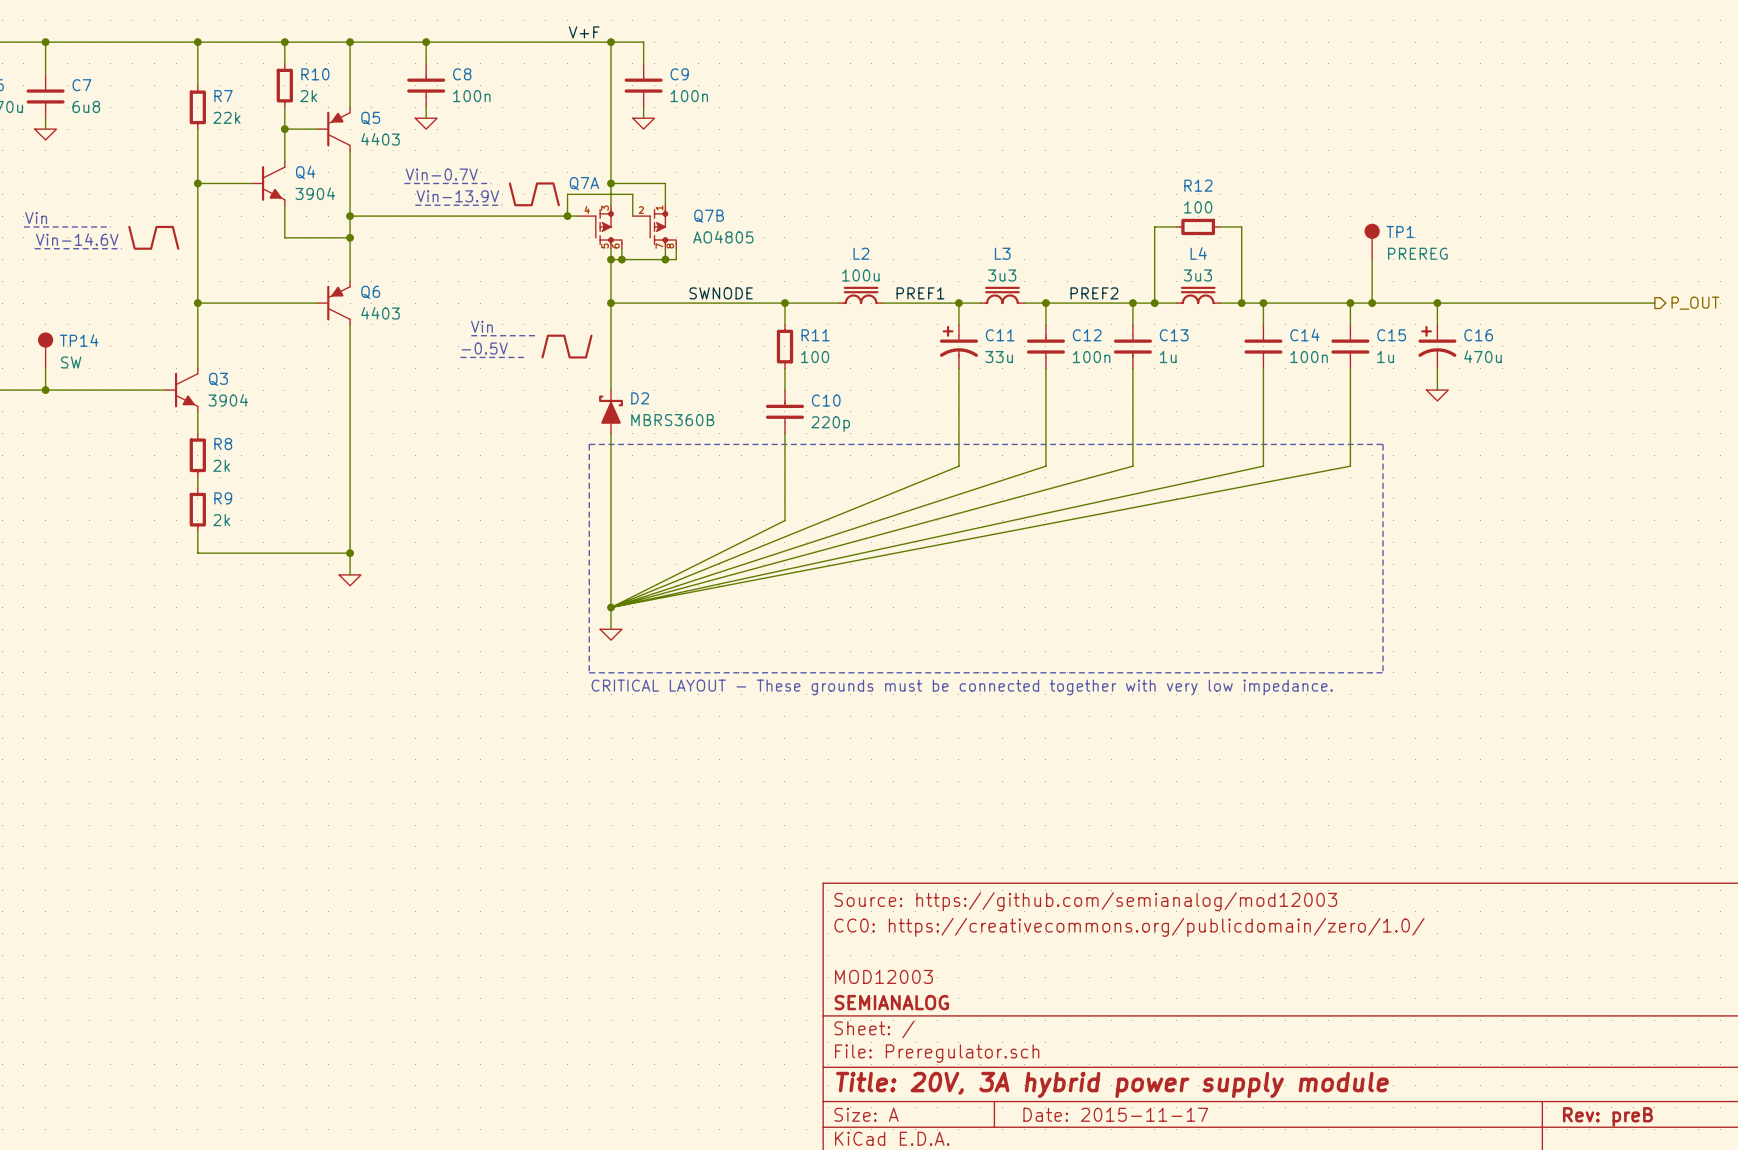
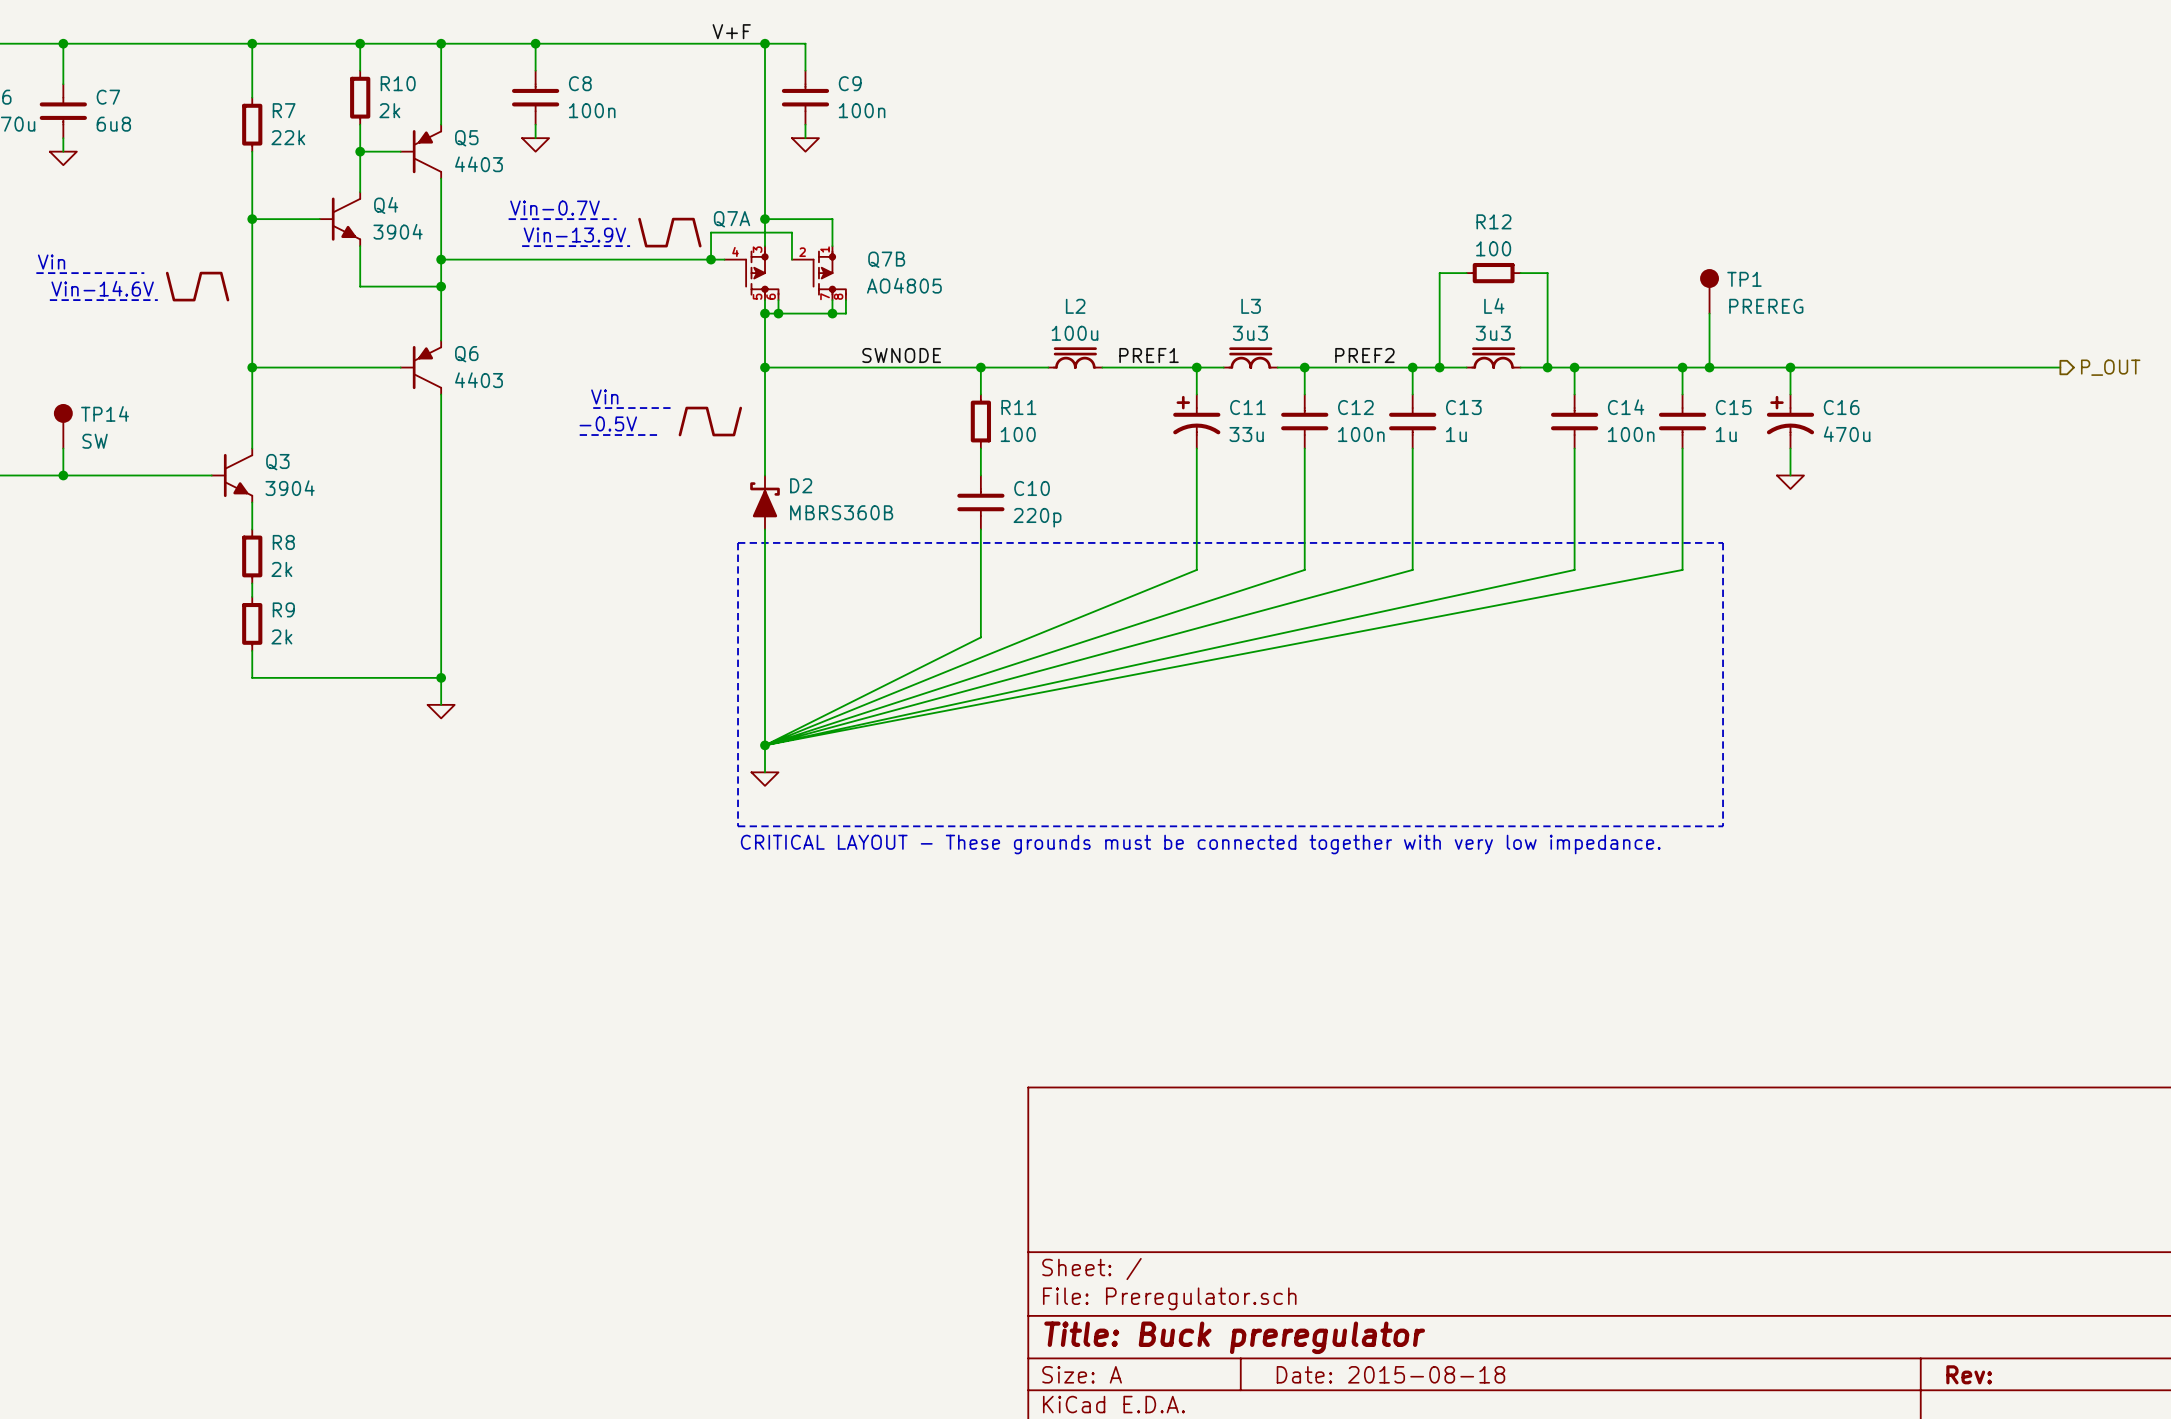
title block: Source: https://github.com/semianalog/mod12003 (1085, 901) -> none
title block: CC0: https://creativecommons.org/publicdomain/zero/1.0/ (1129, 927) -> none
title block: MOD12003 (883, 976) -> none
title block: SEMIANALOG (891, 1002) -> none
title block: Title: 20V, 3A hybrid power supply module (1112, 1084) -> Title: Buck preregulator (1234, 1337)
title block: Date: 2015-11-17 (1115, 1114) -> Date: 2015-08-18 (1390, 1374)
title block: Rev: preB (1607, 1116) -> Rev: (1969, 1374)

